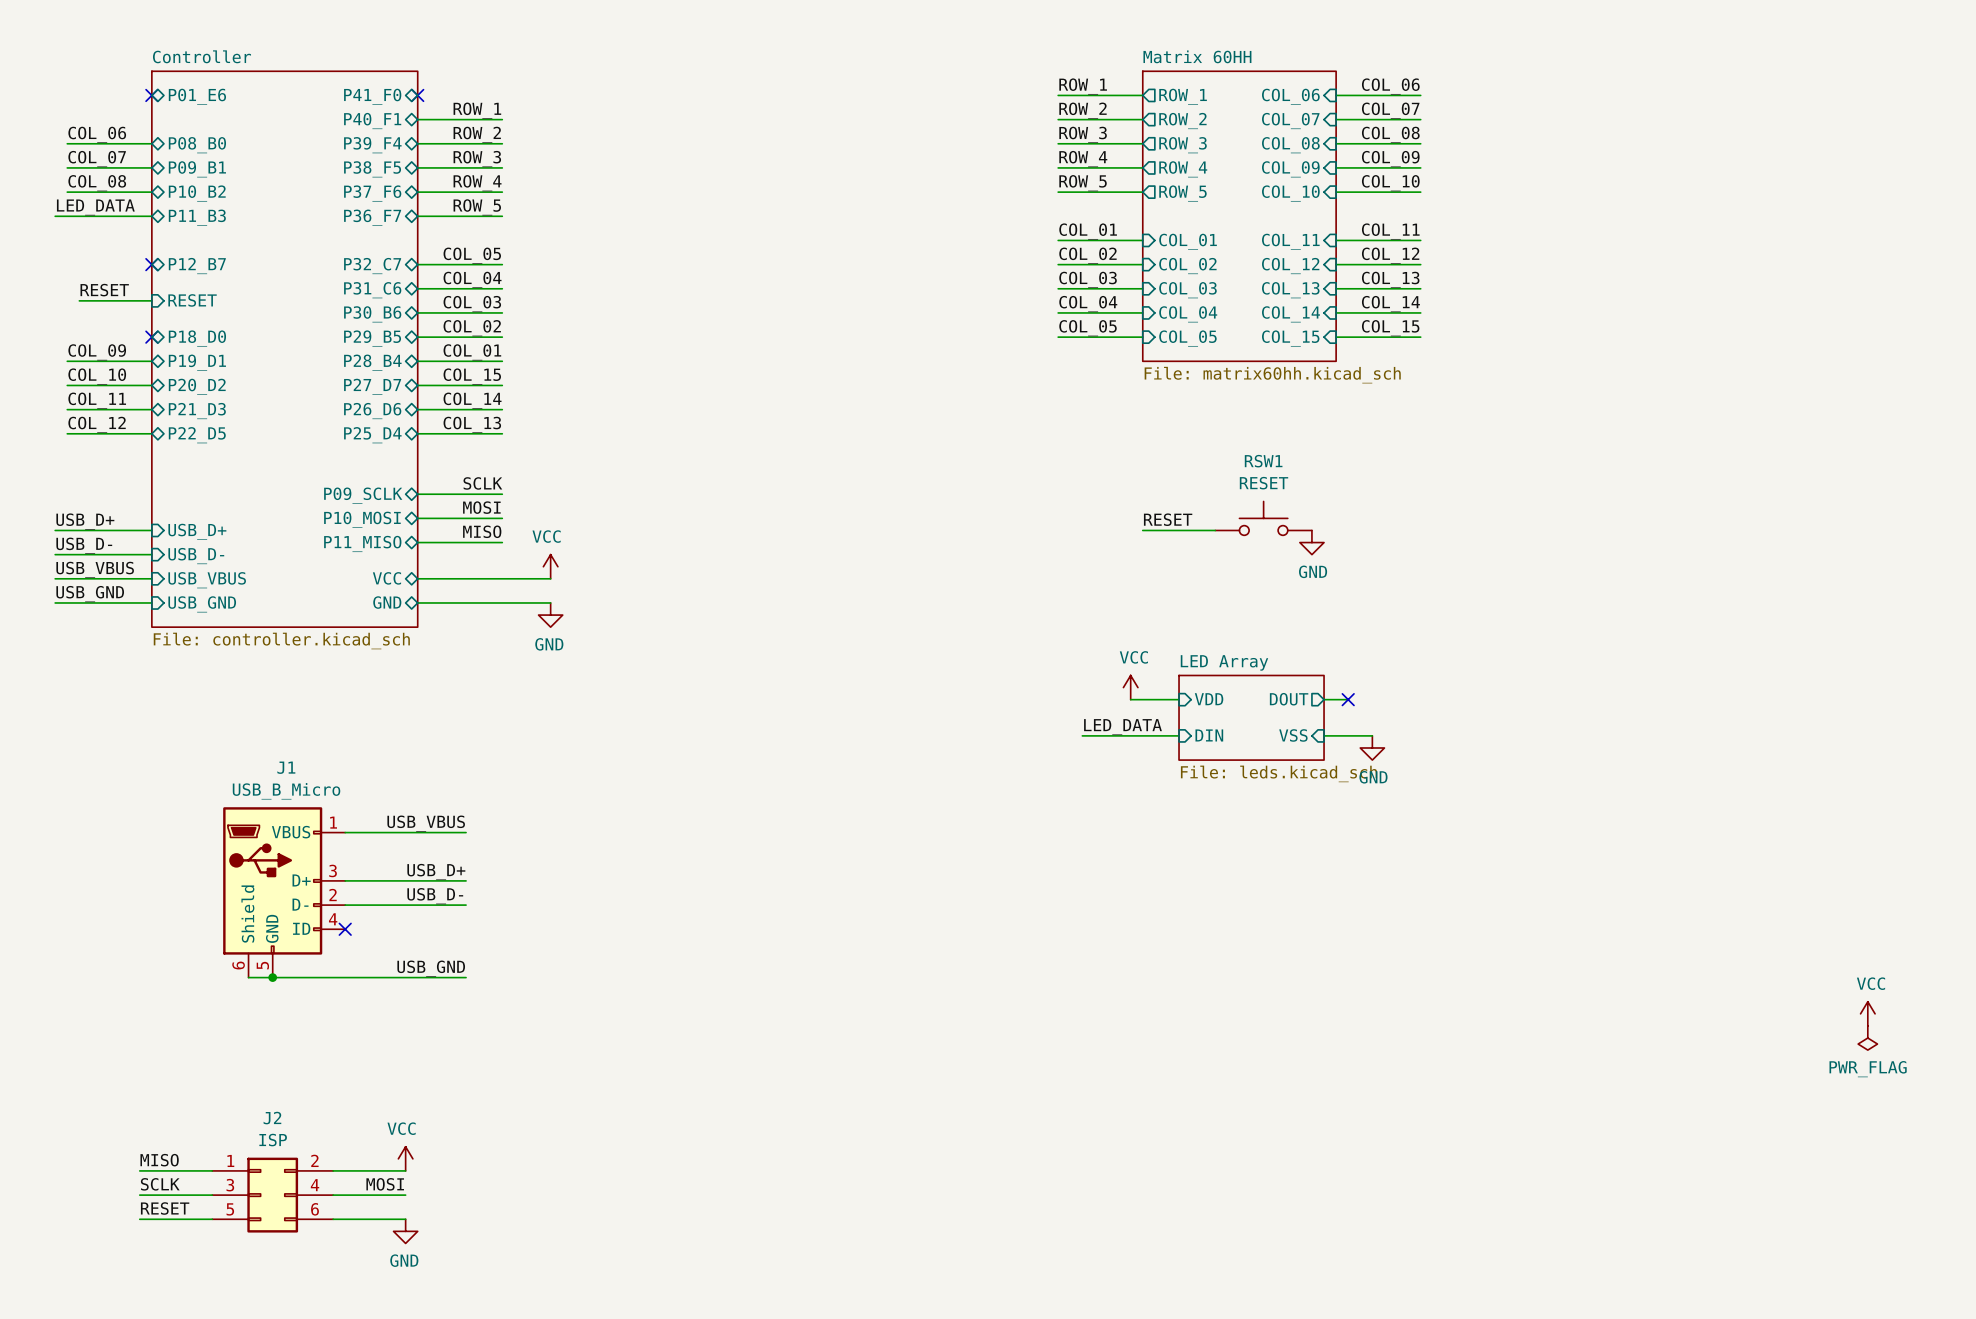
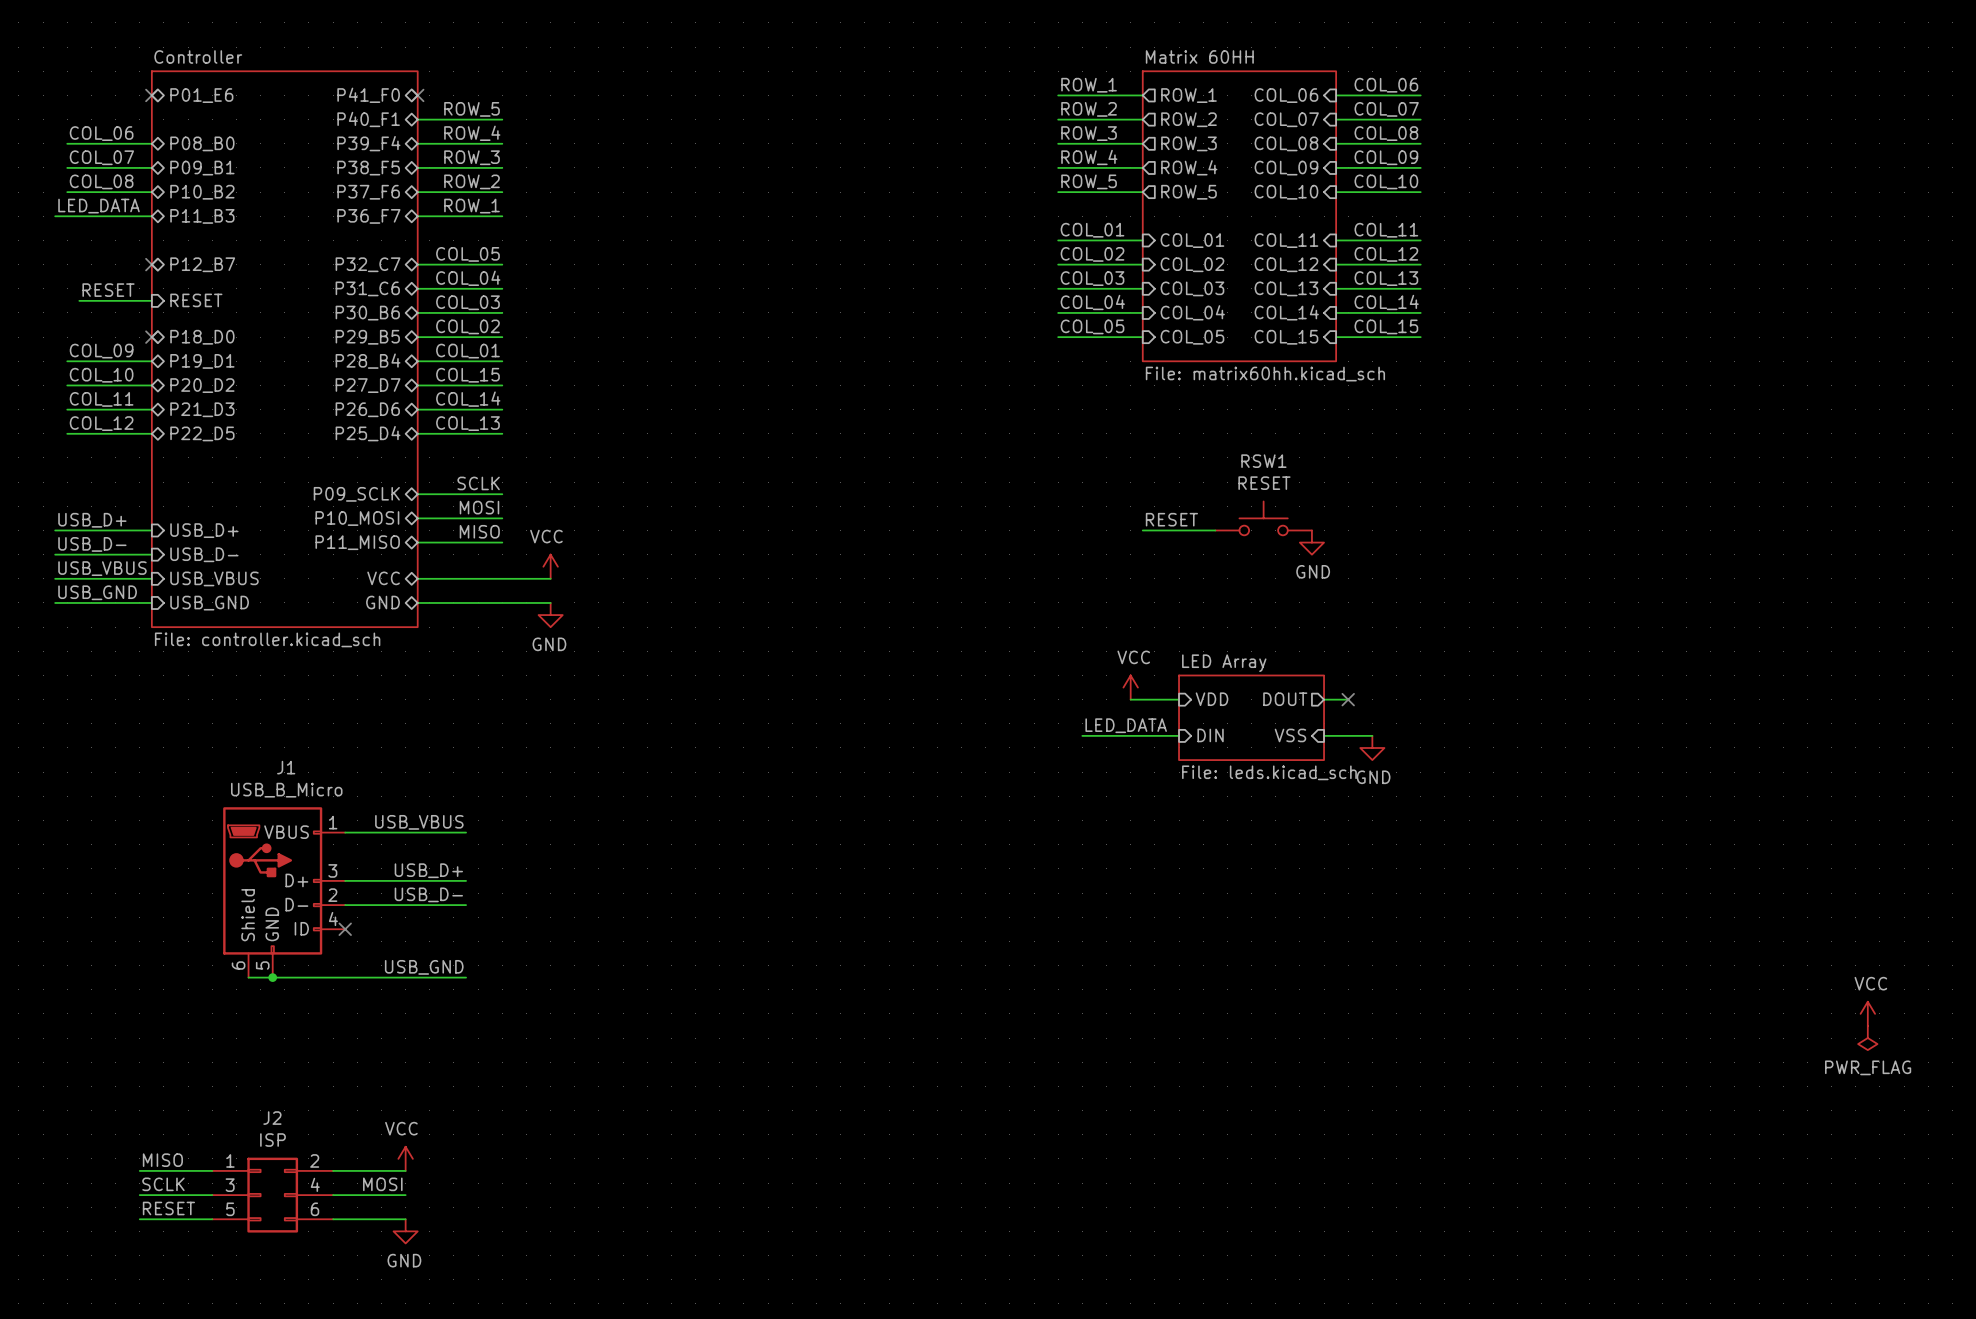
label: ROW_1 (477, 110) -> ROW_5 (472, 109)
label: ROW_2 (477, 134) -> ROW_4 (472, 133)
label: ROW_4 (477, 183) -> ROW_2 (472, 181)
label: ROW_5 (477, 207) -> ROW_1 (472, 206)

